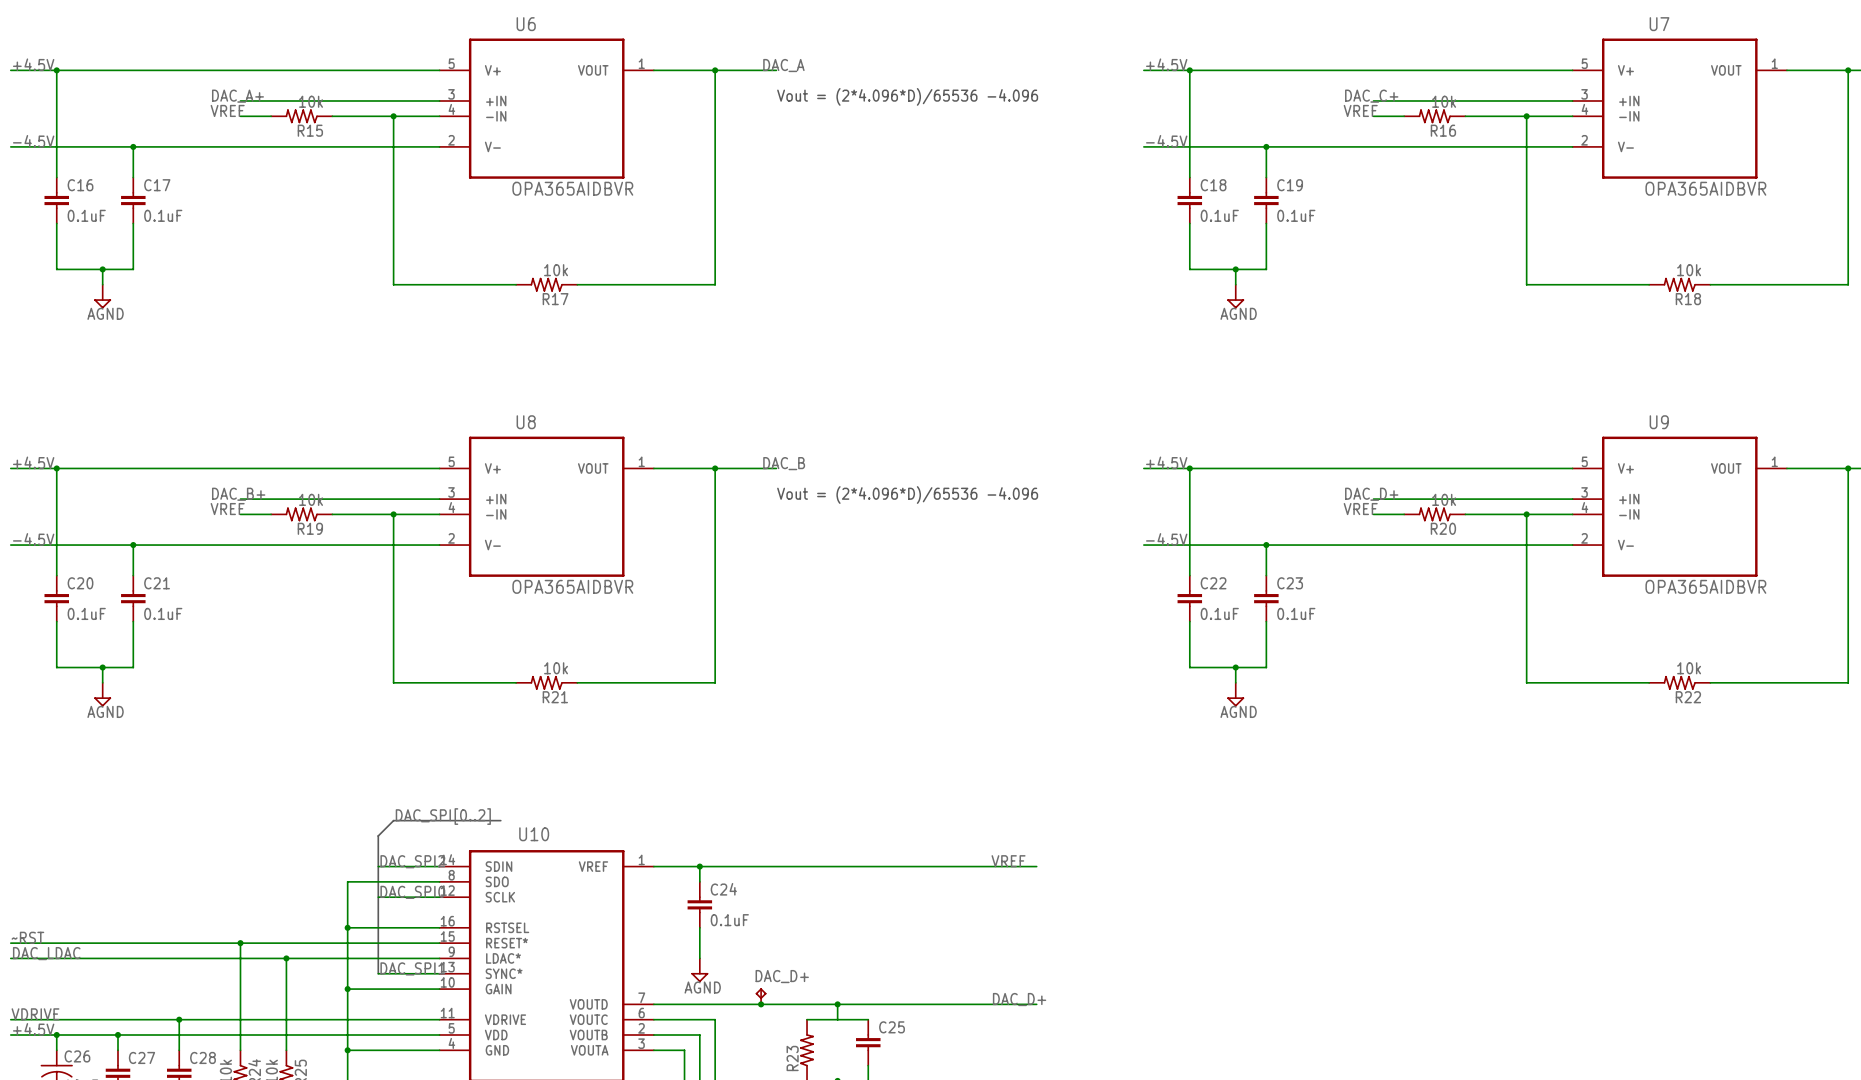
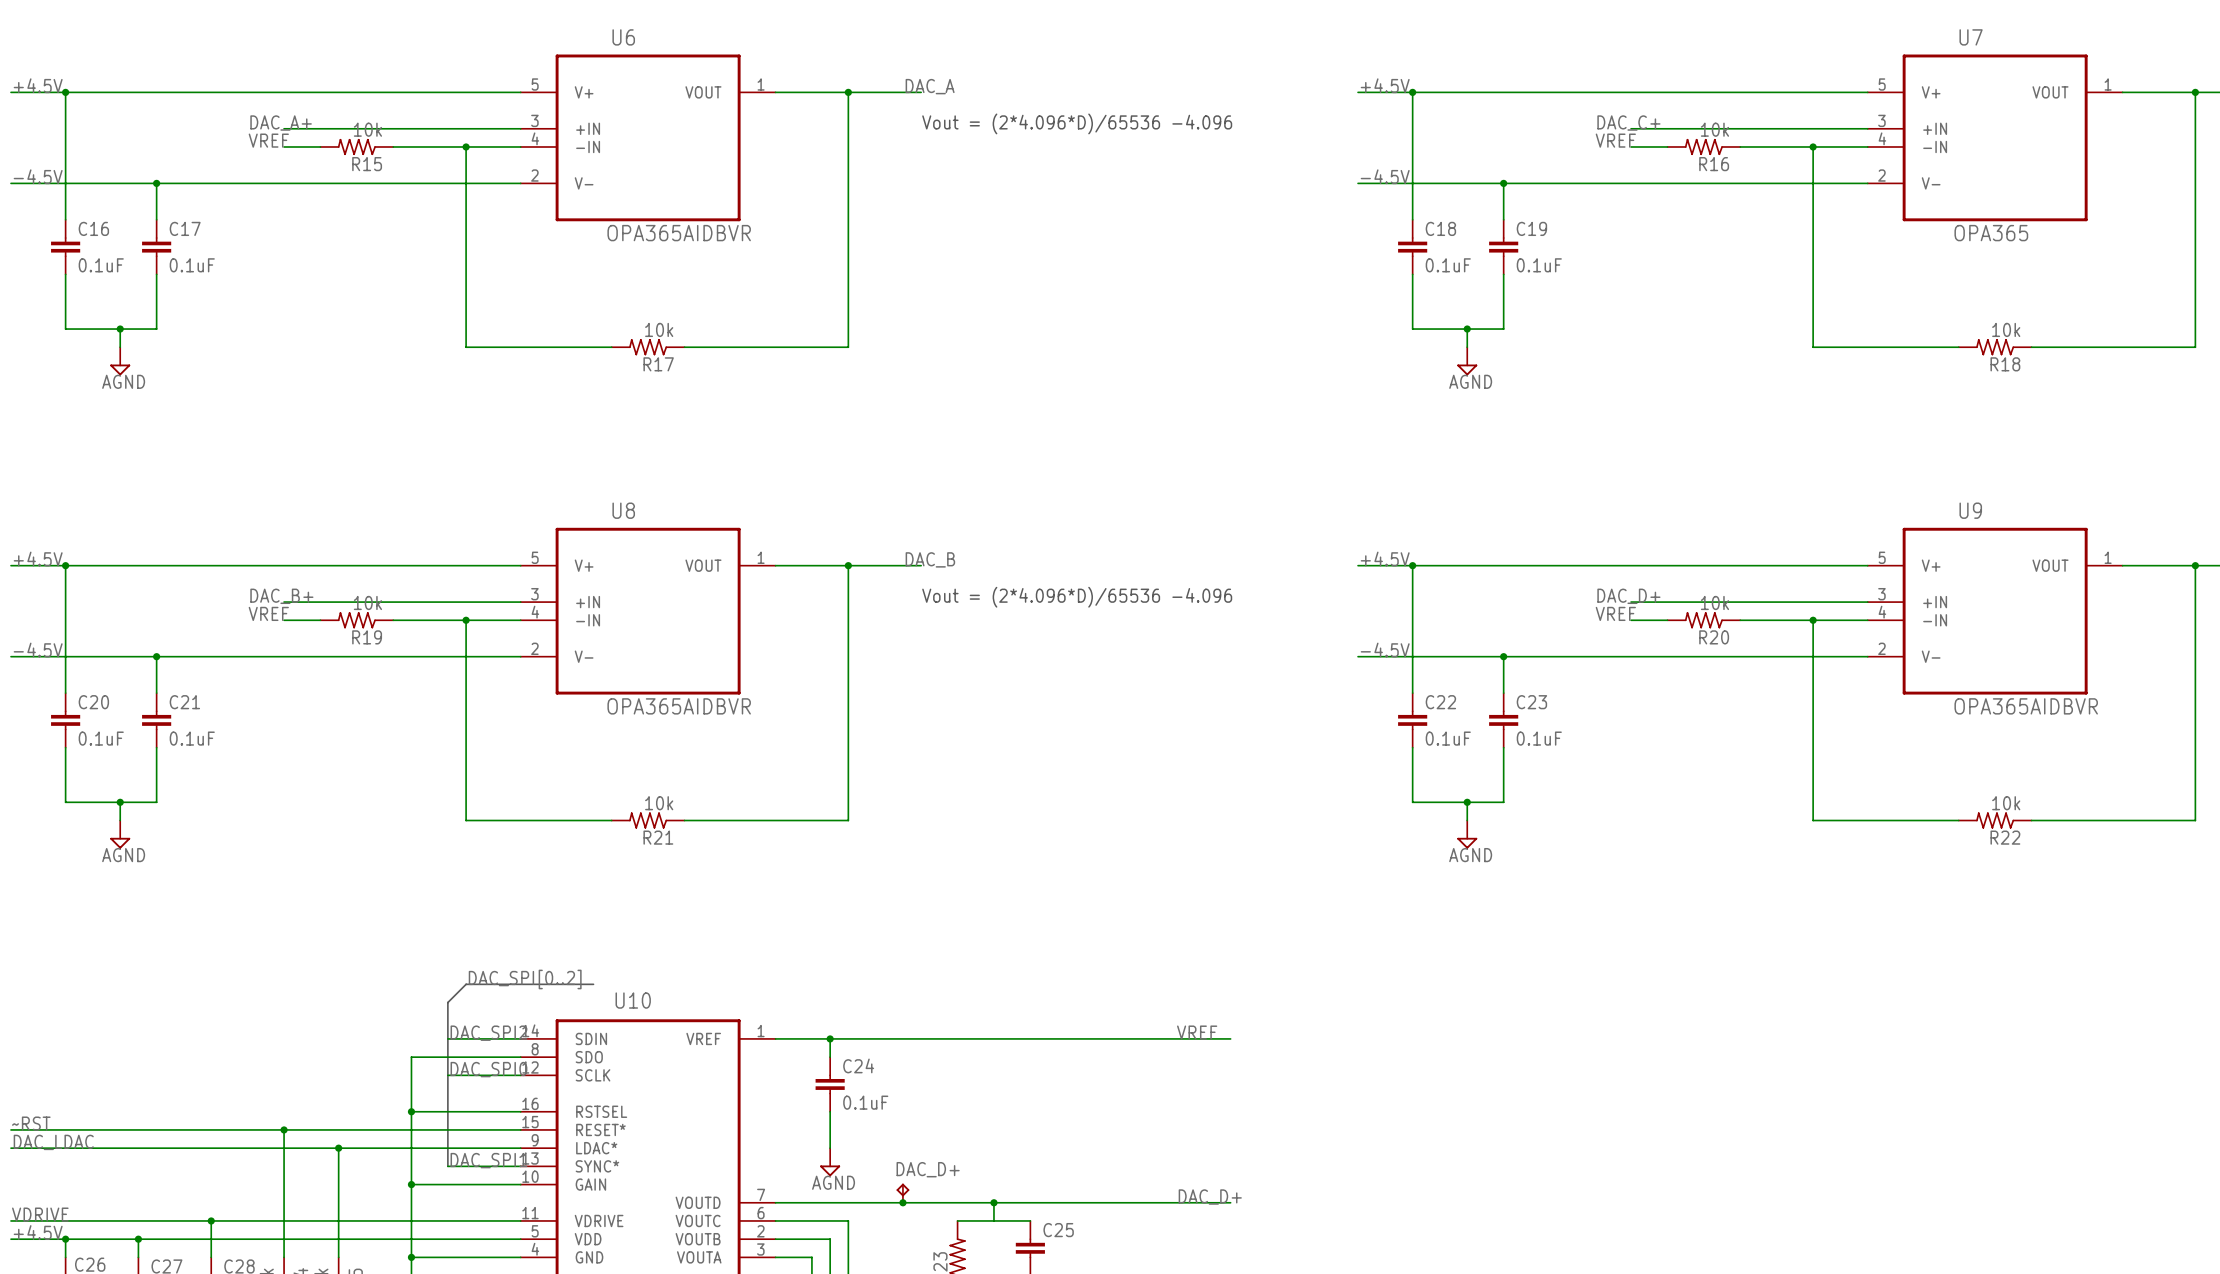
U7 value: OPA365AIDBVR (1705, 188) -> OPA365 (1991, 233)

